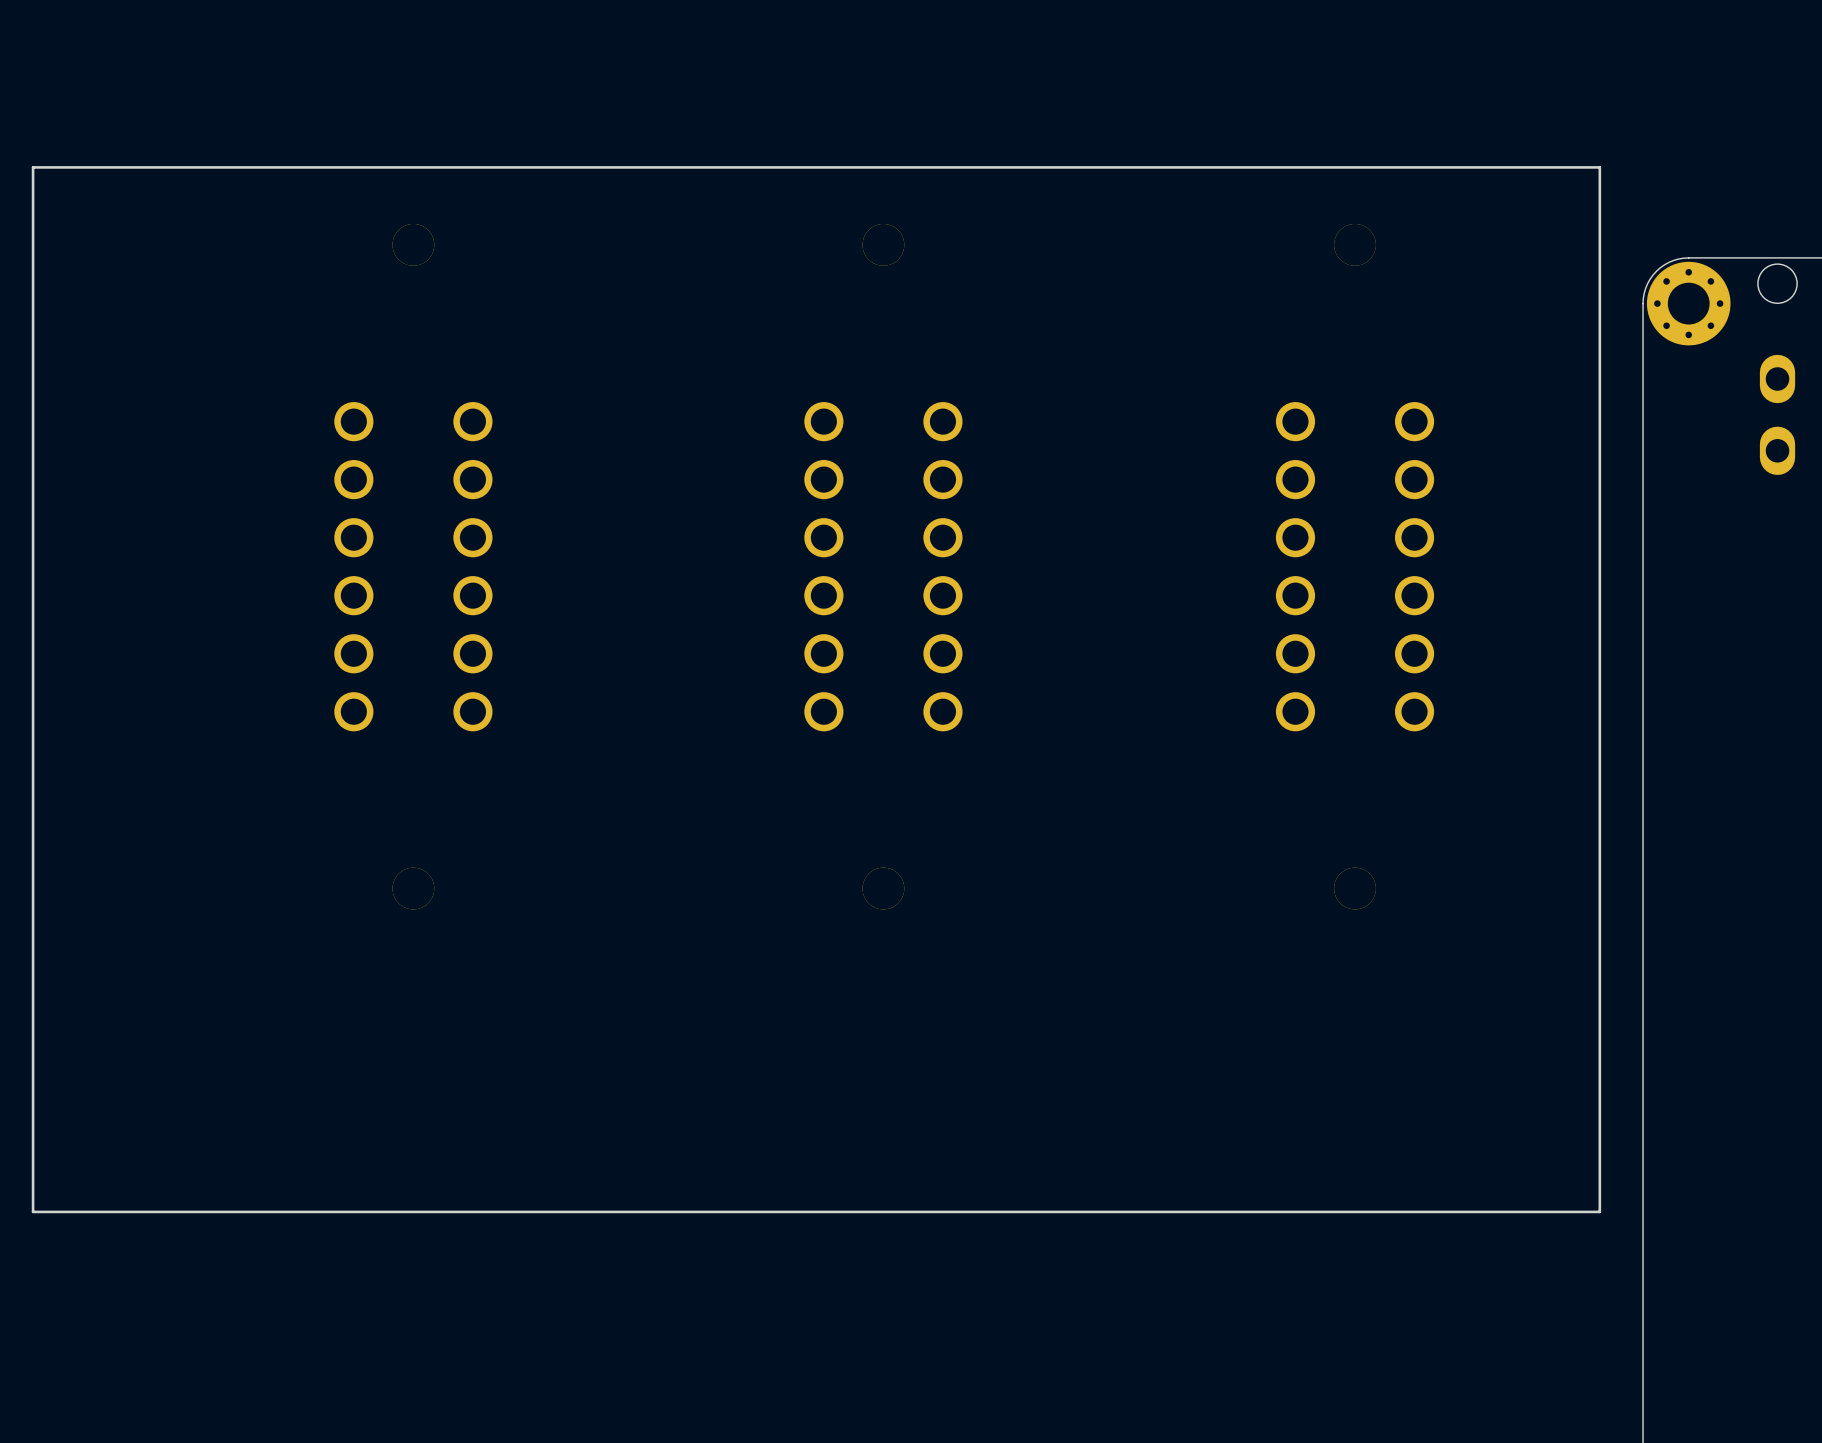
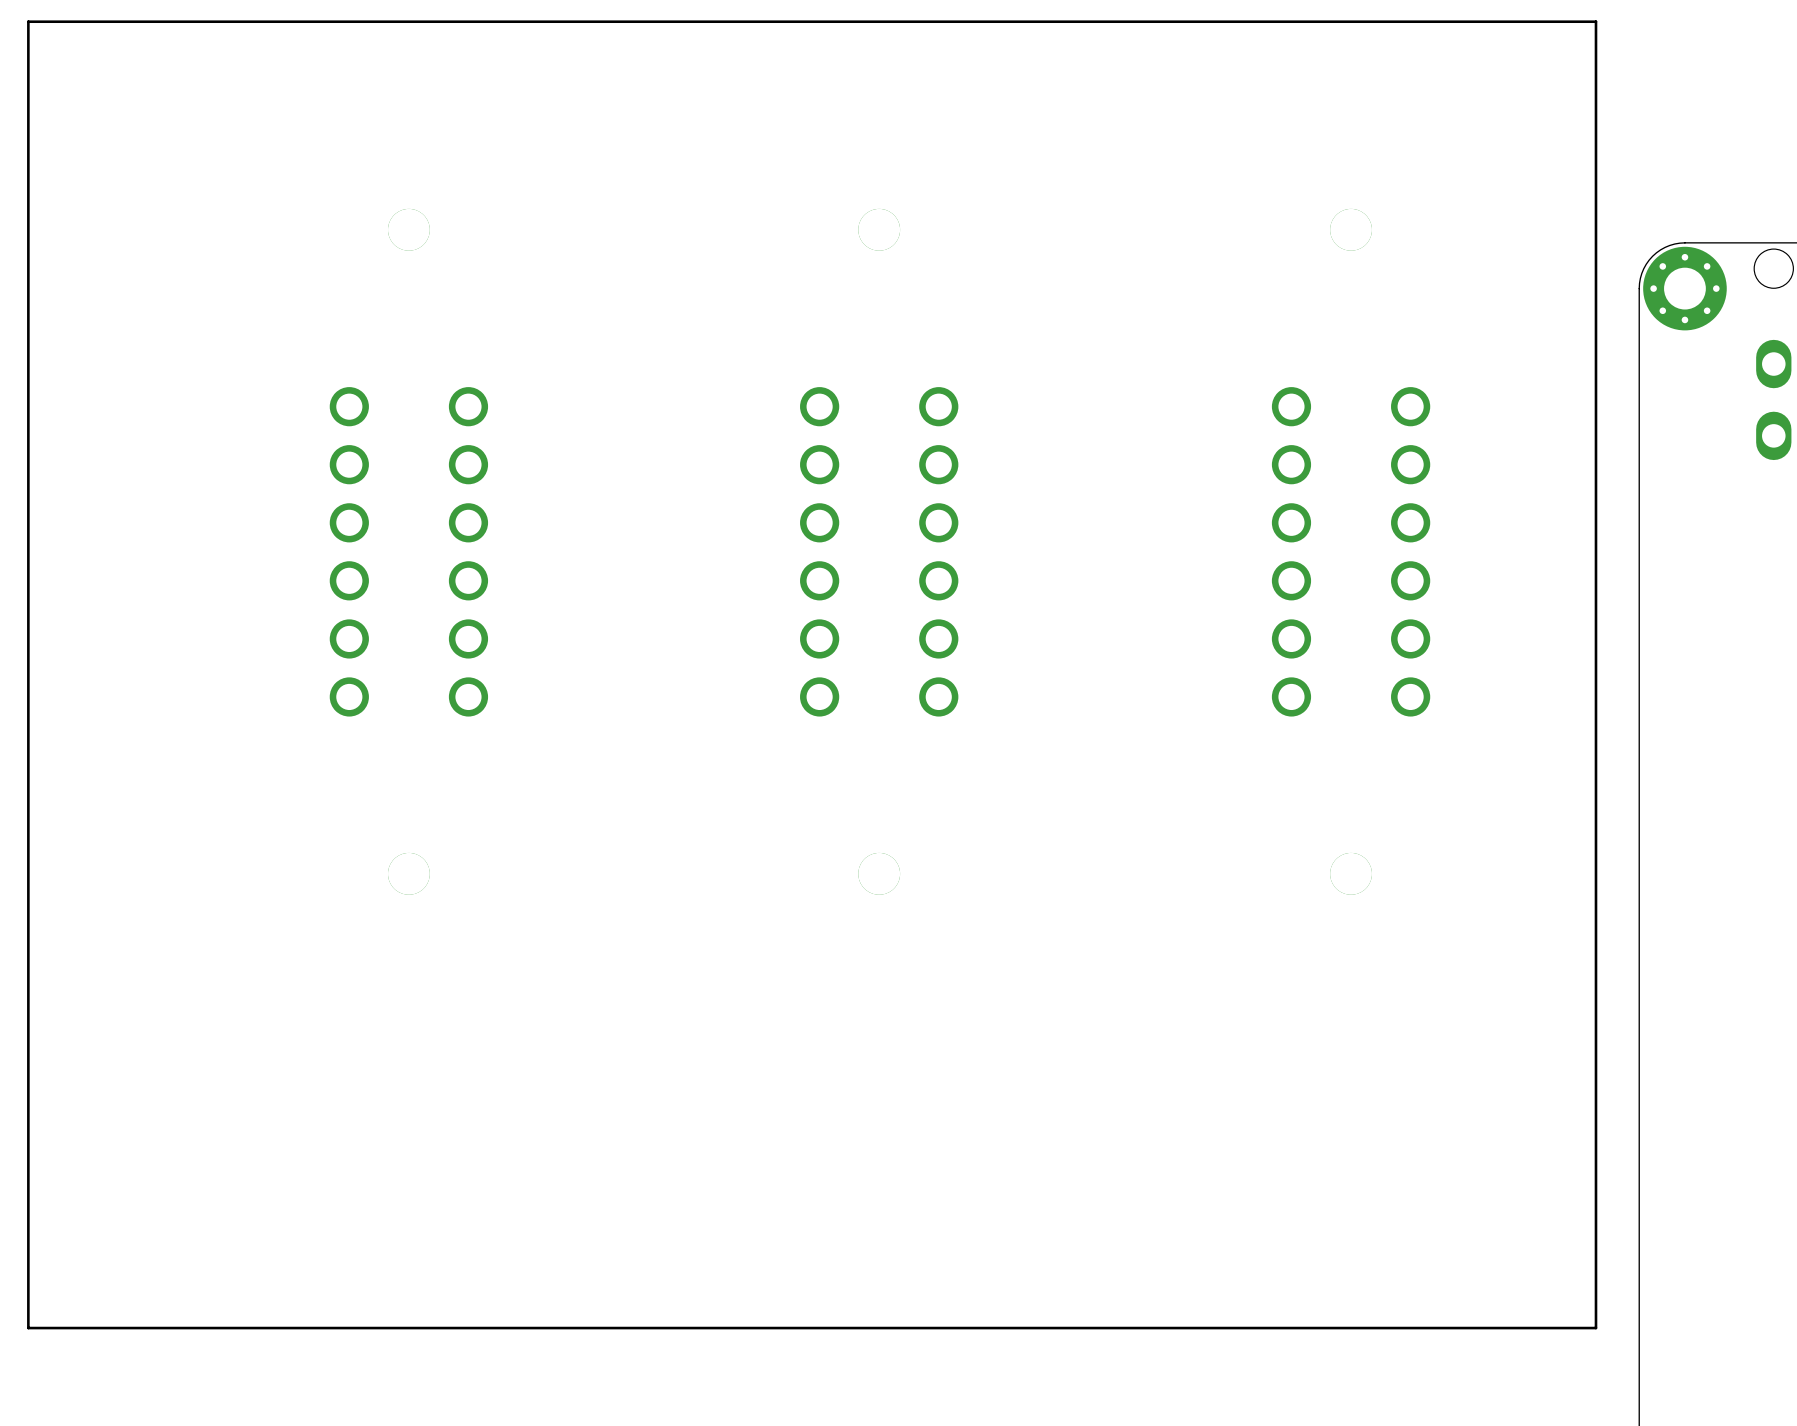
board edge: (1599, 167) (33, 167) -> (1595, 152) (1595, 21) (28, 21) (28, 152)
board edge: (1599, 1211) (33, 1211) -> (1595, 1197) (1595, 1328) (28, 1328) (28, 1197)

